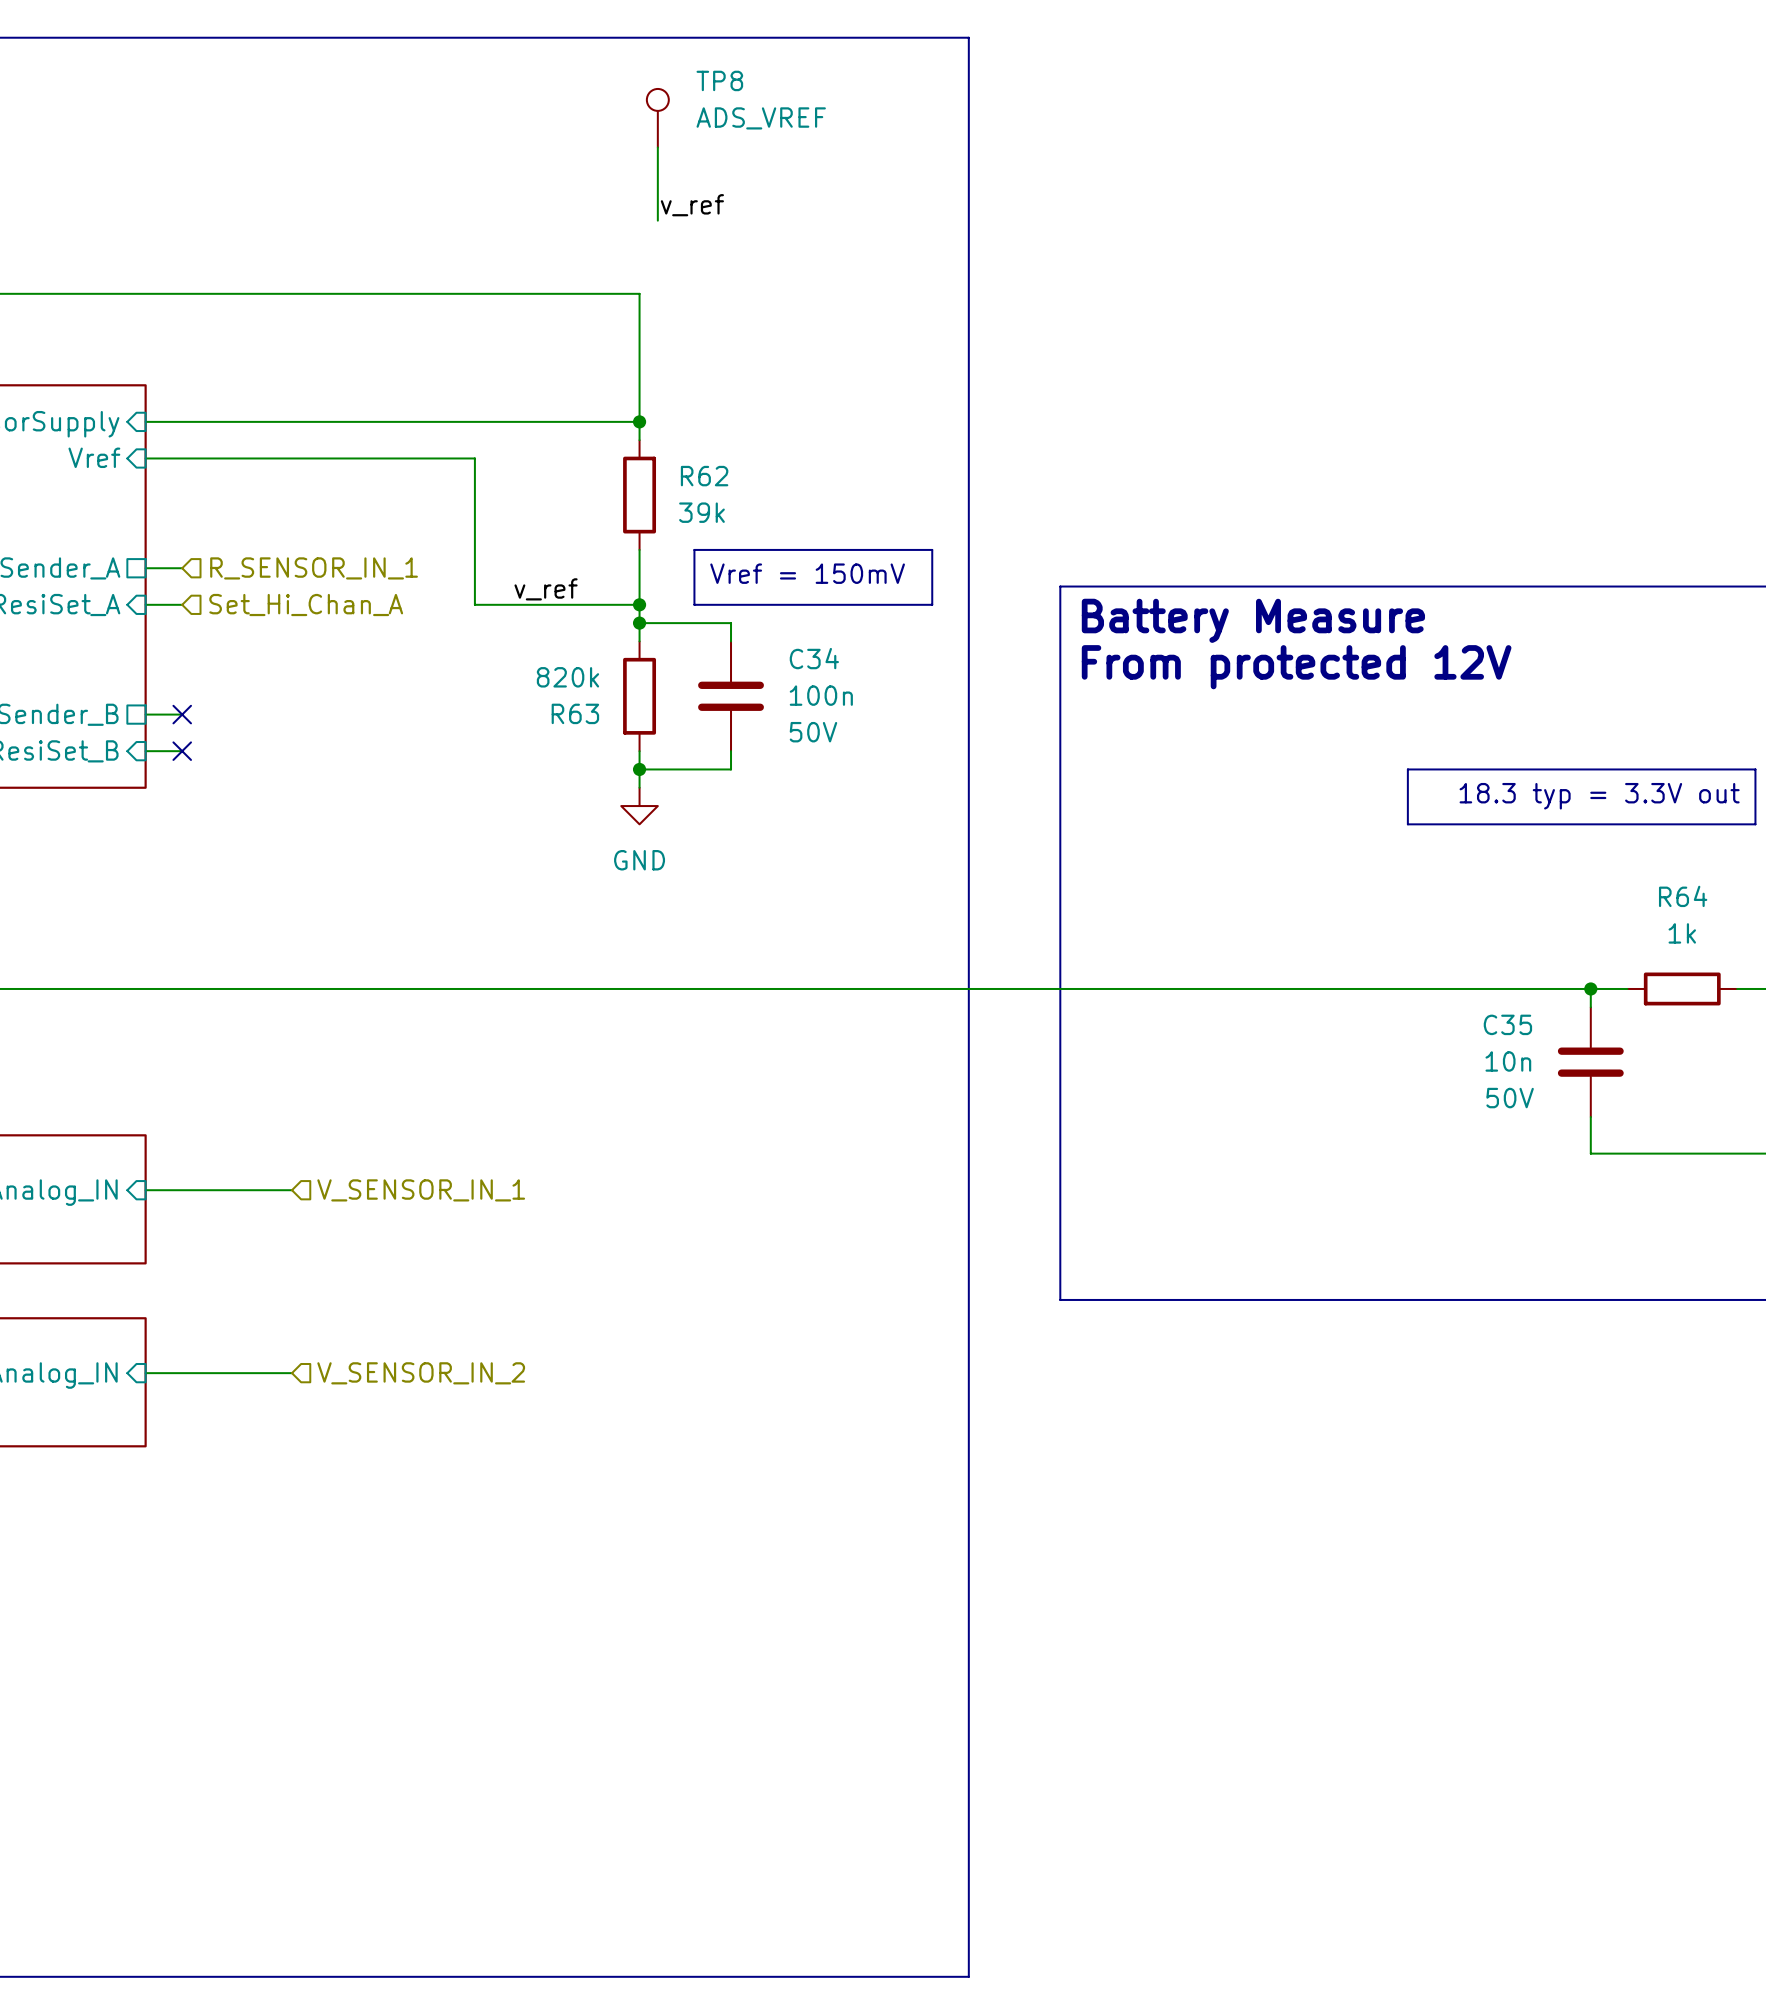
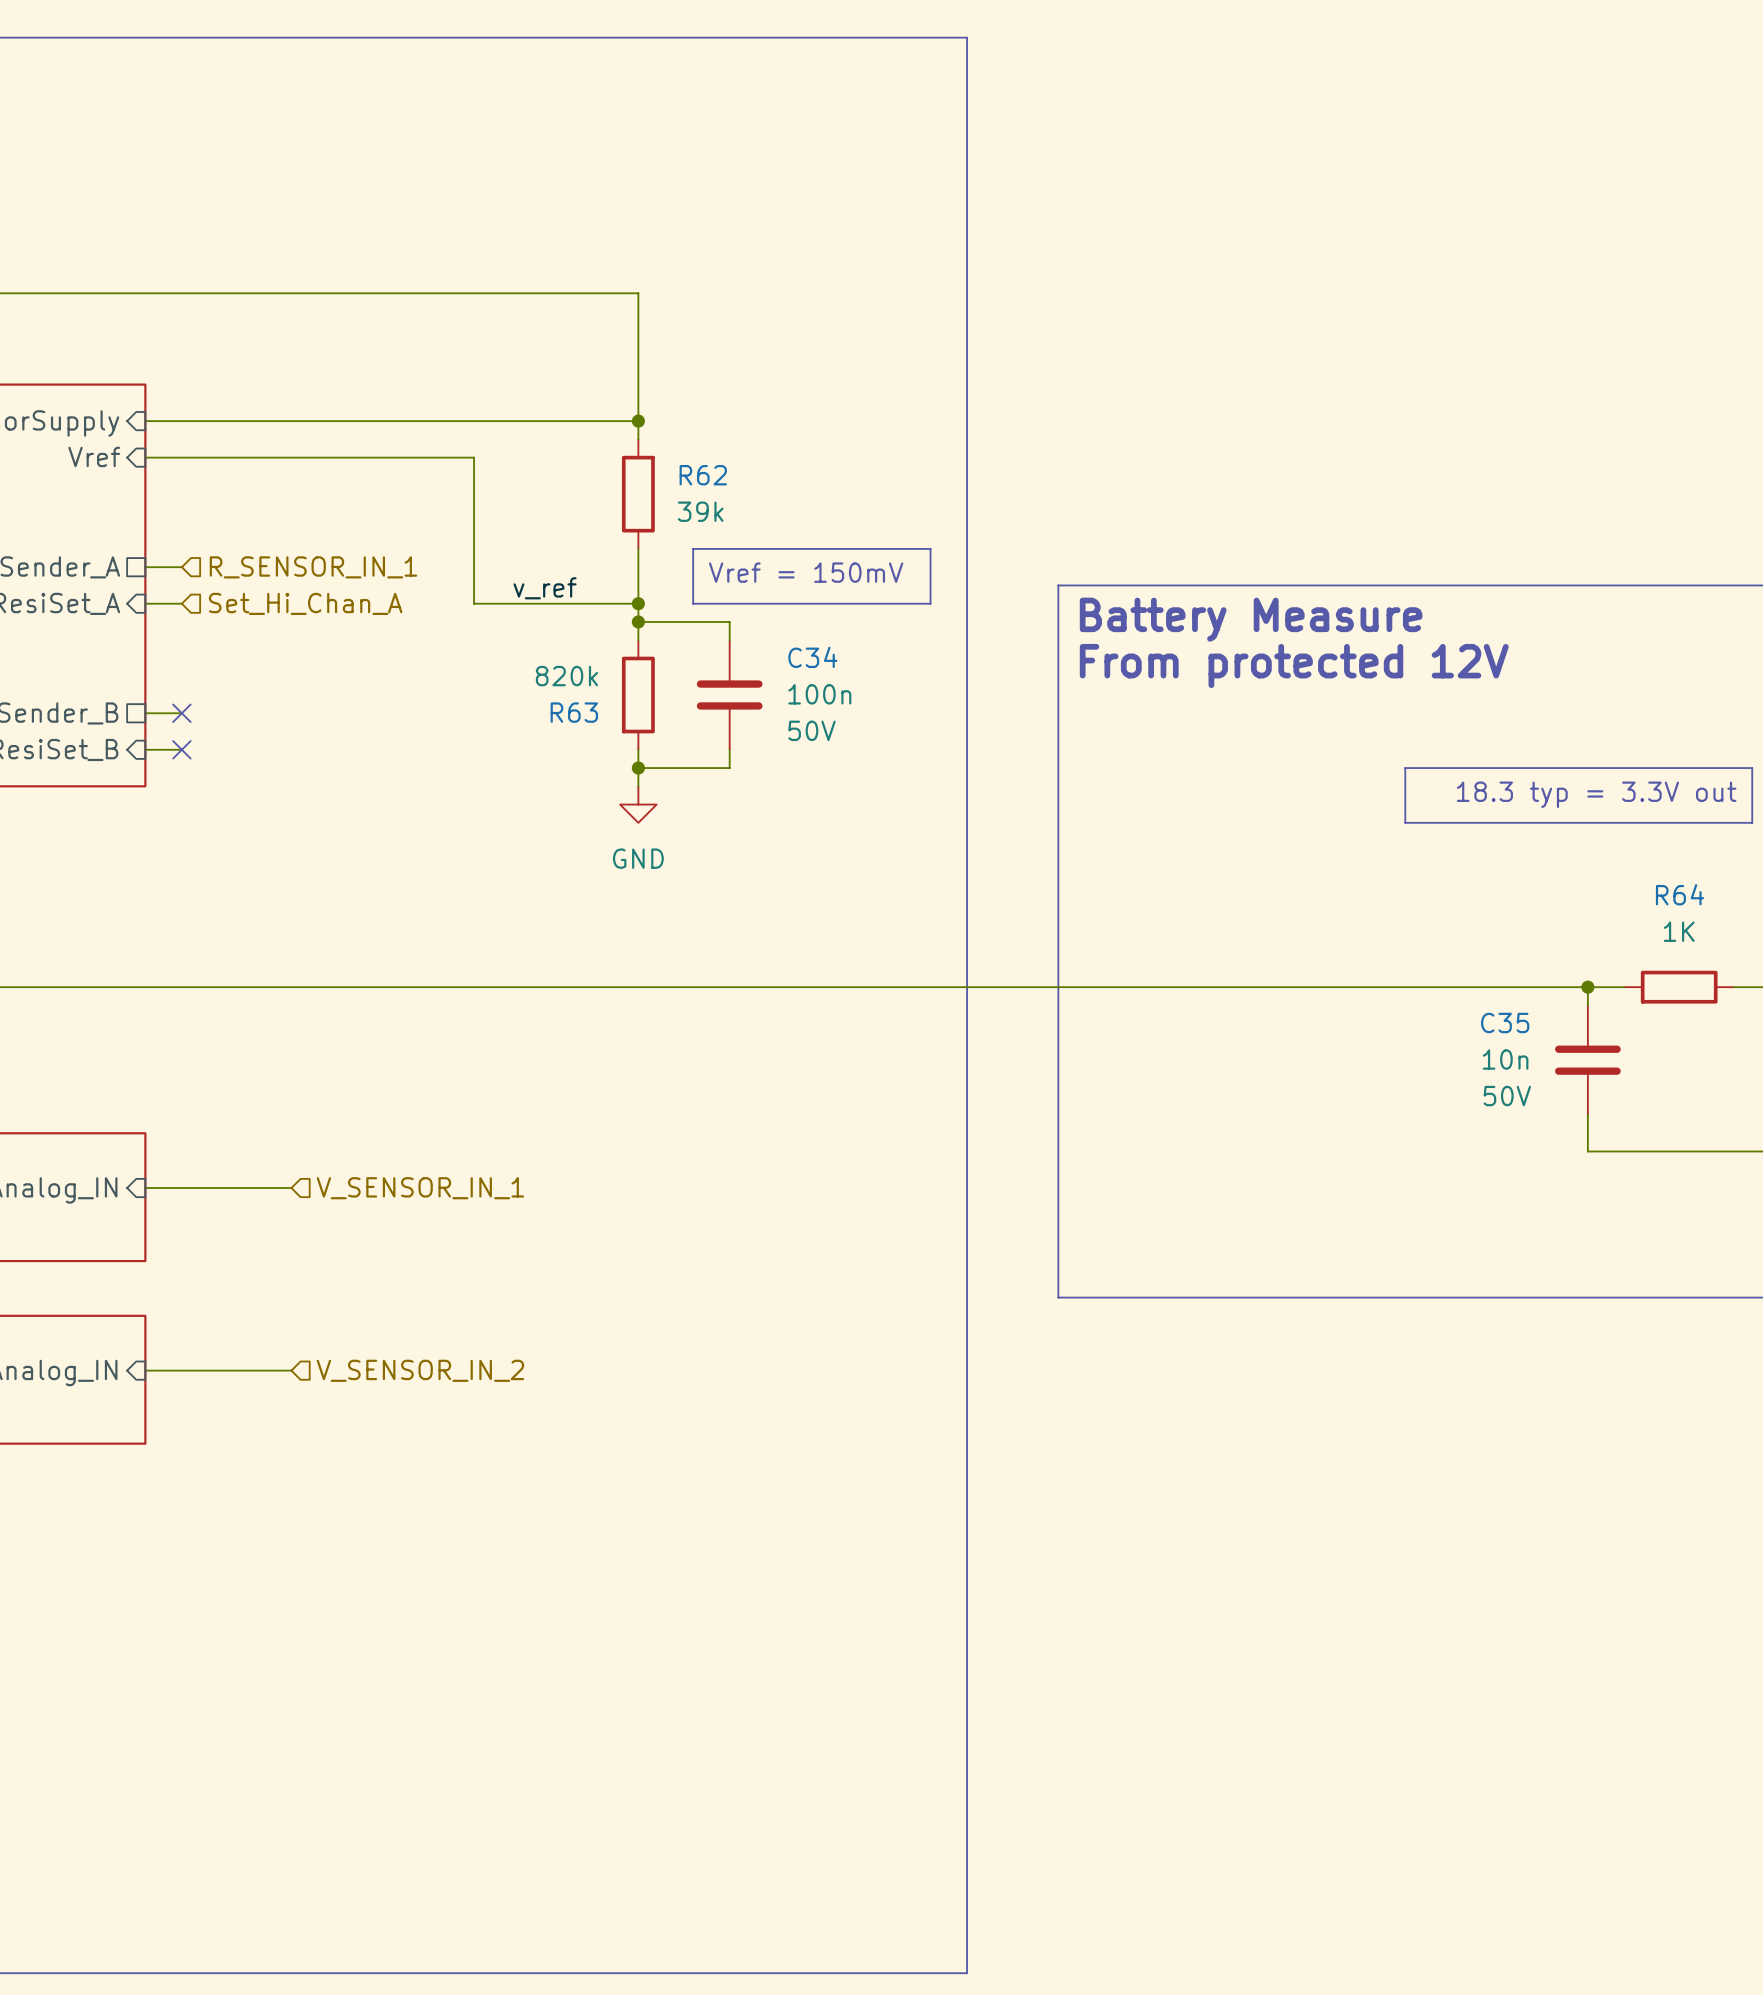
TP8: ADS_VREF (657, 118) -> none
wire: (657, 147) (657, 220) -> none
label: v_ref (692, 205) -> none
R64 value: 1k (1682, 933) -> 1K (1679, 931)

